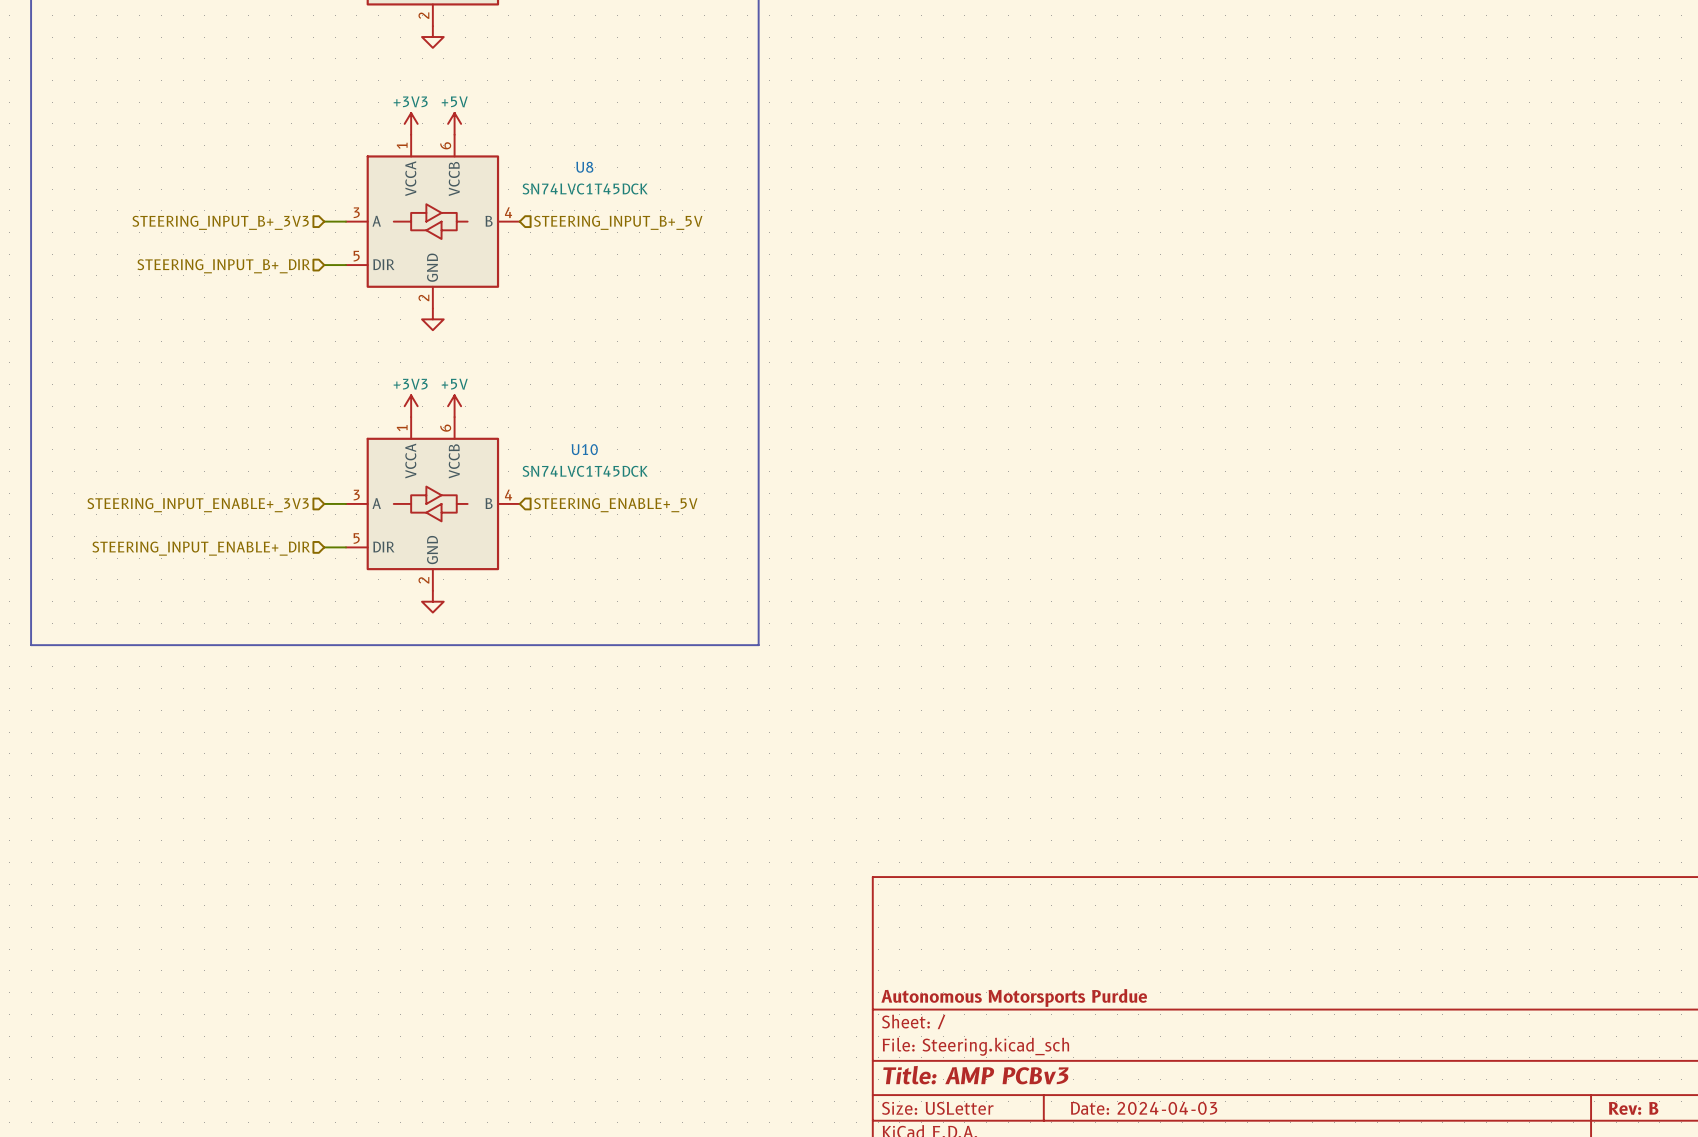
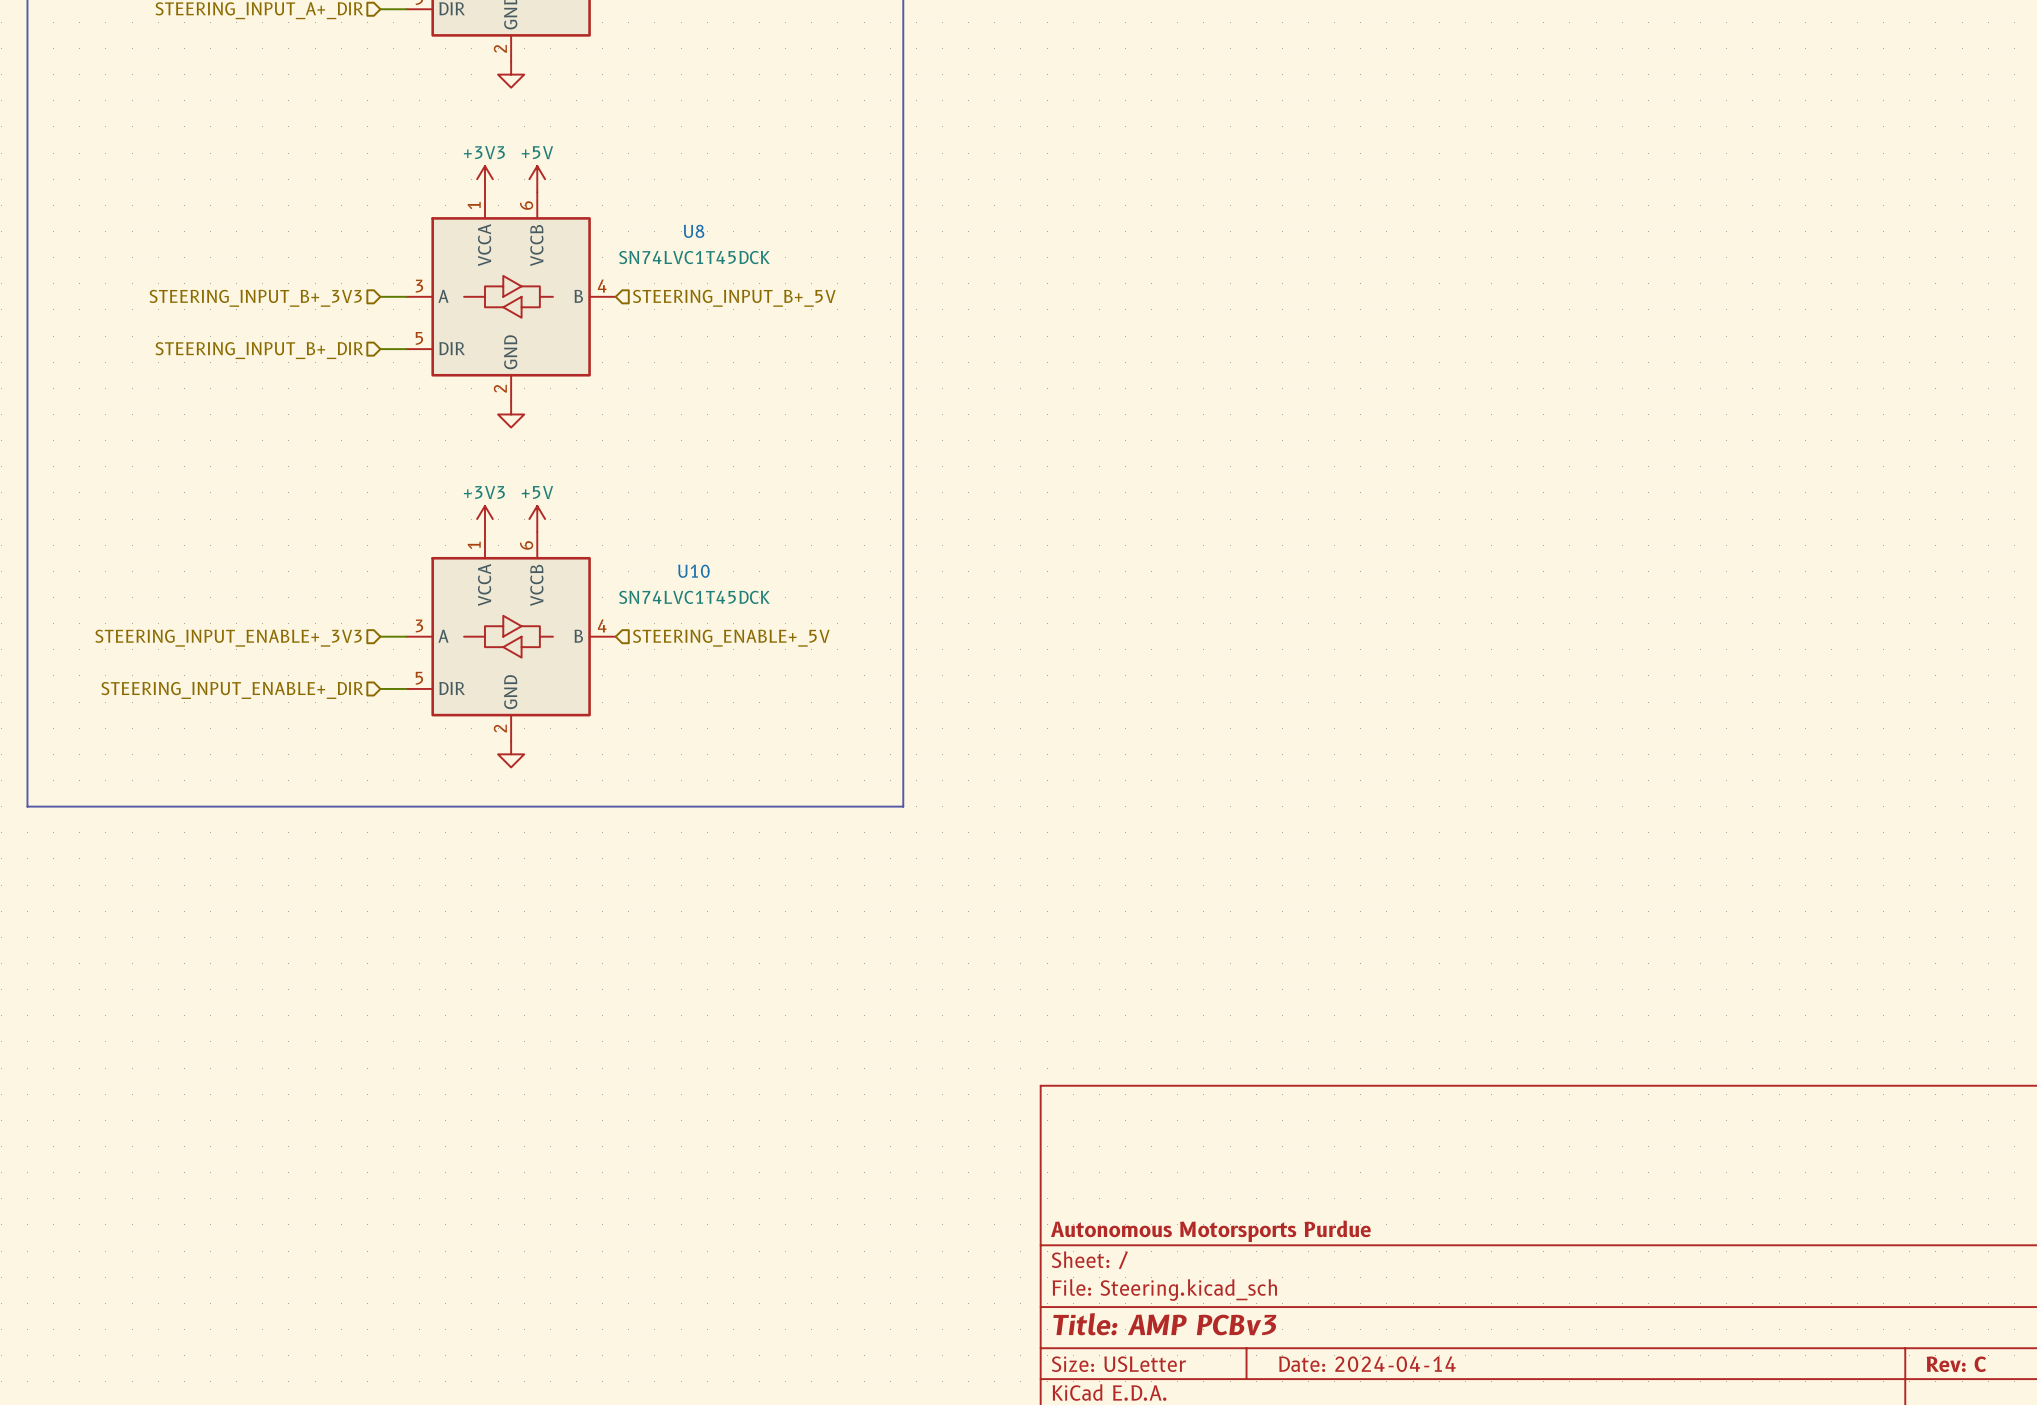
title block: Date: 2024-04-03 (1144, 1108) -> Date: 2024-04-14 (1367, 1364)
title block: Rev: B (1633, 1108) -> Rev: C (1956, 1364)

